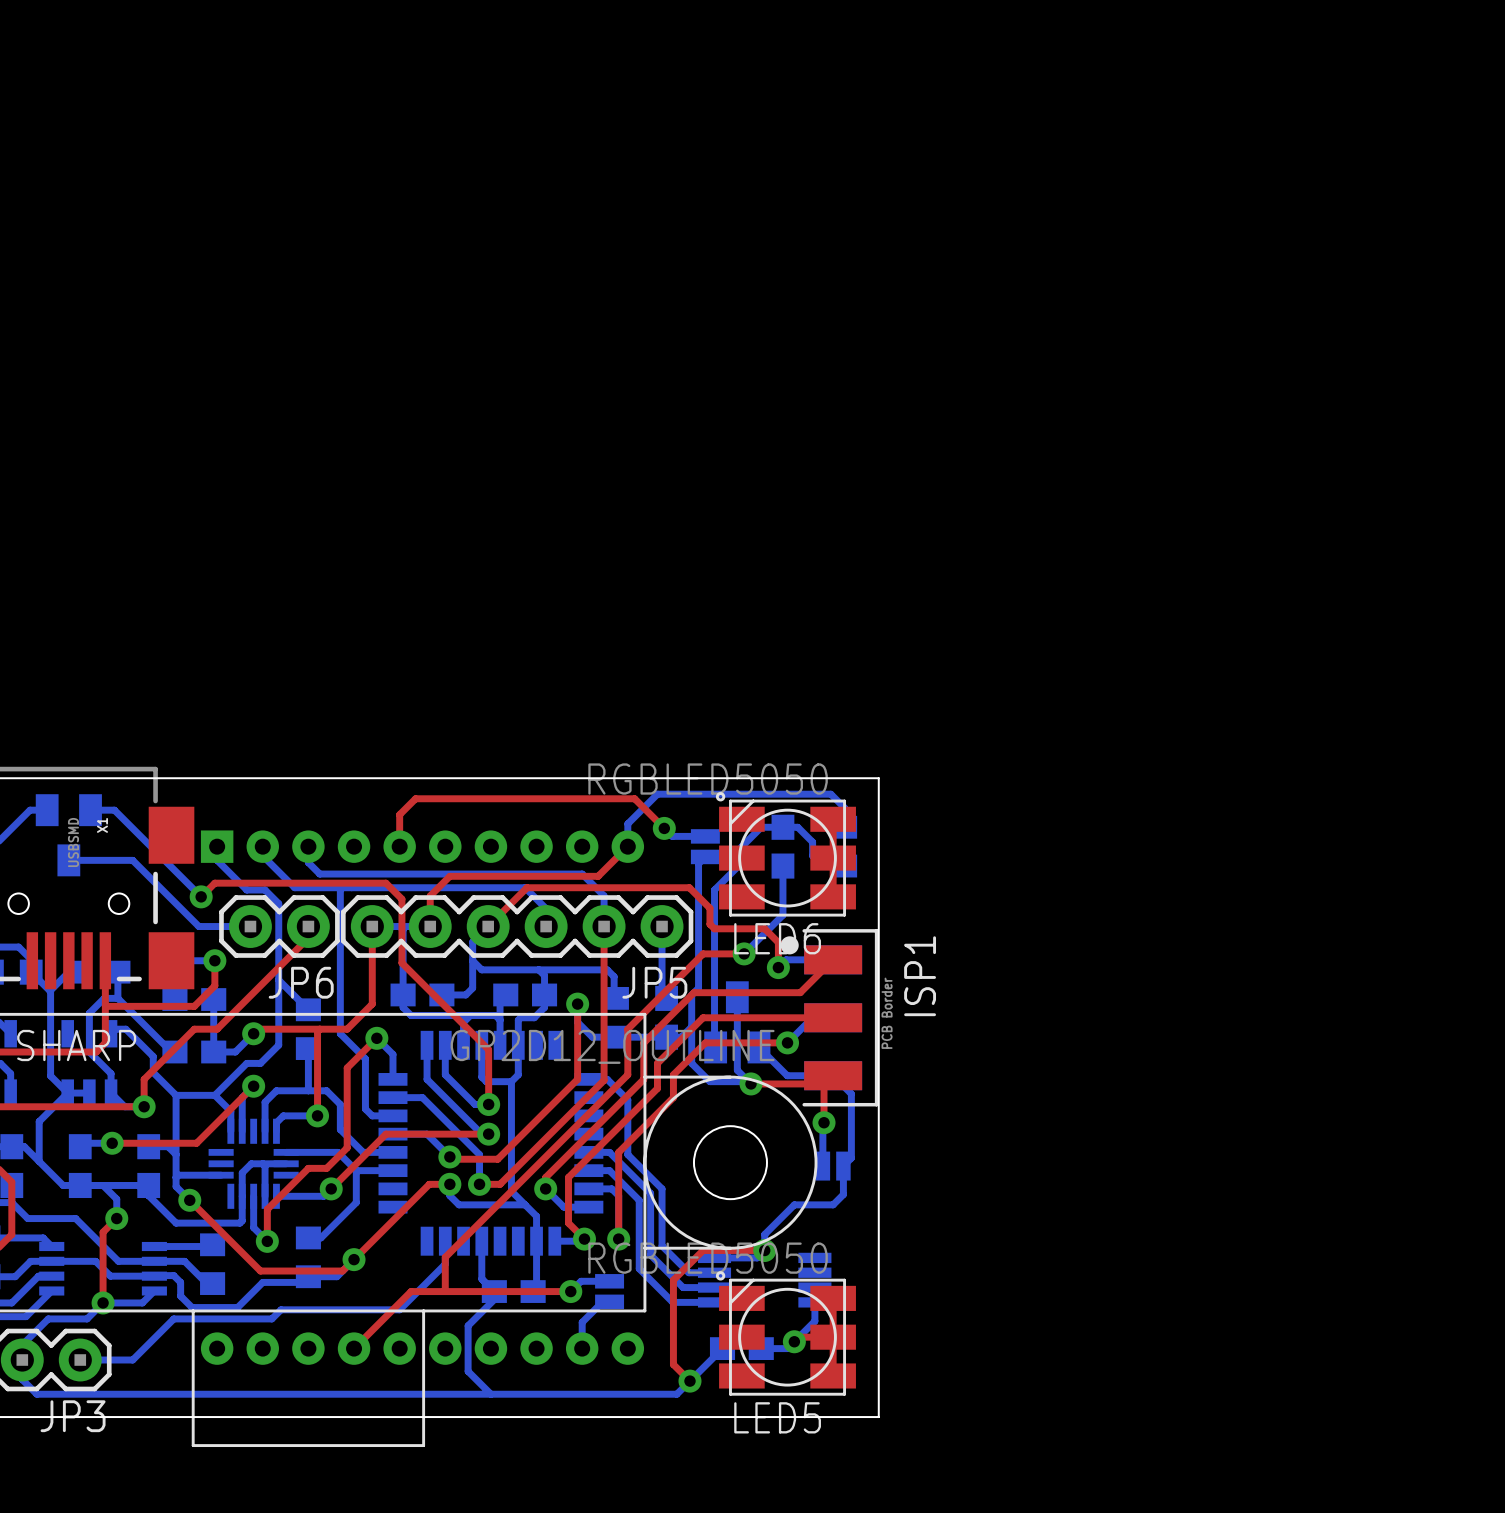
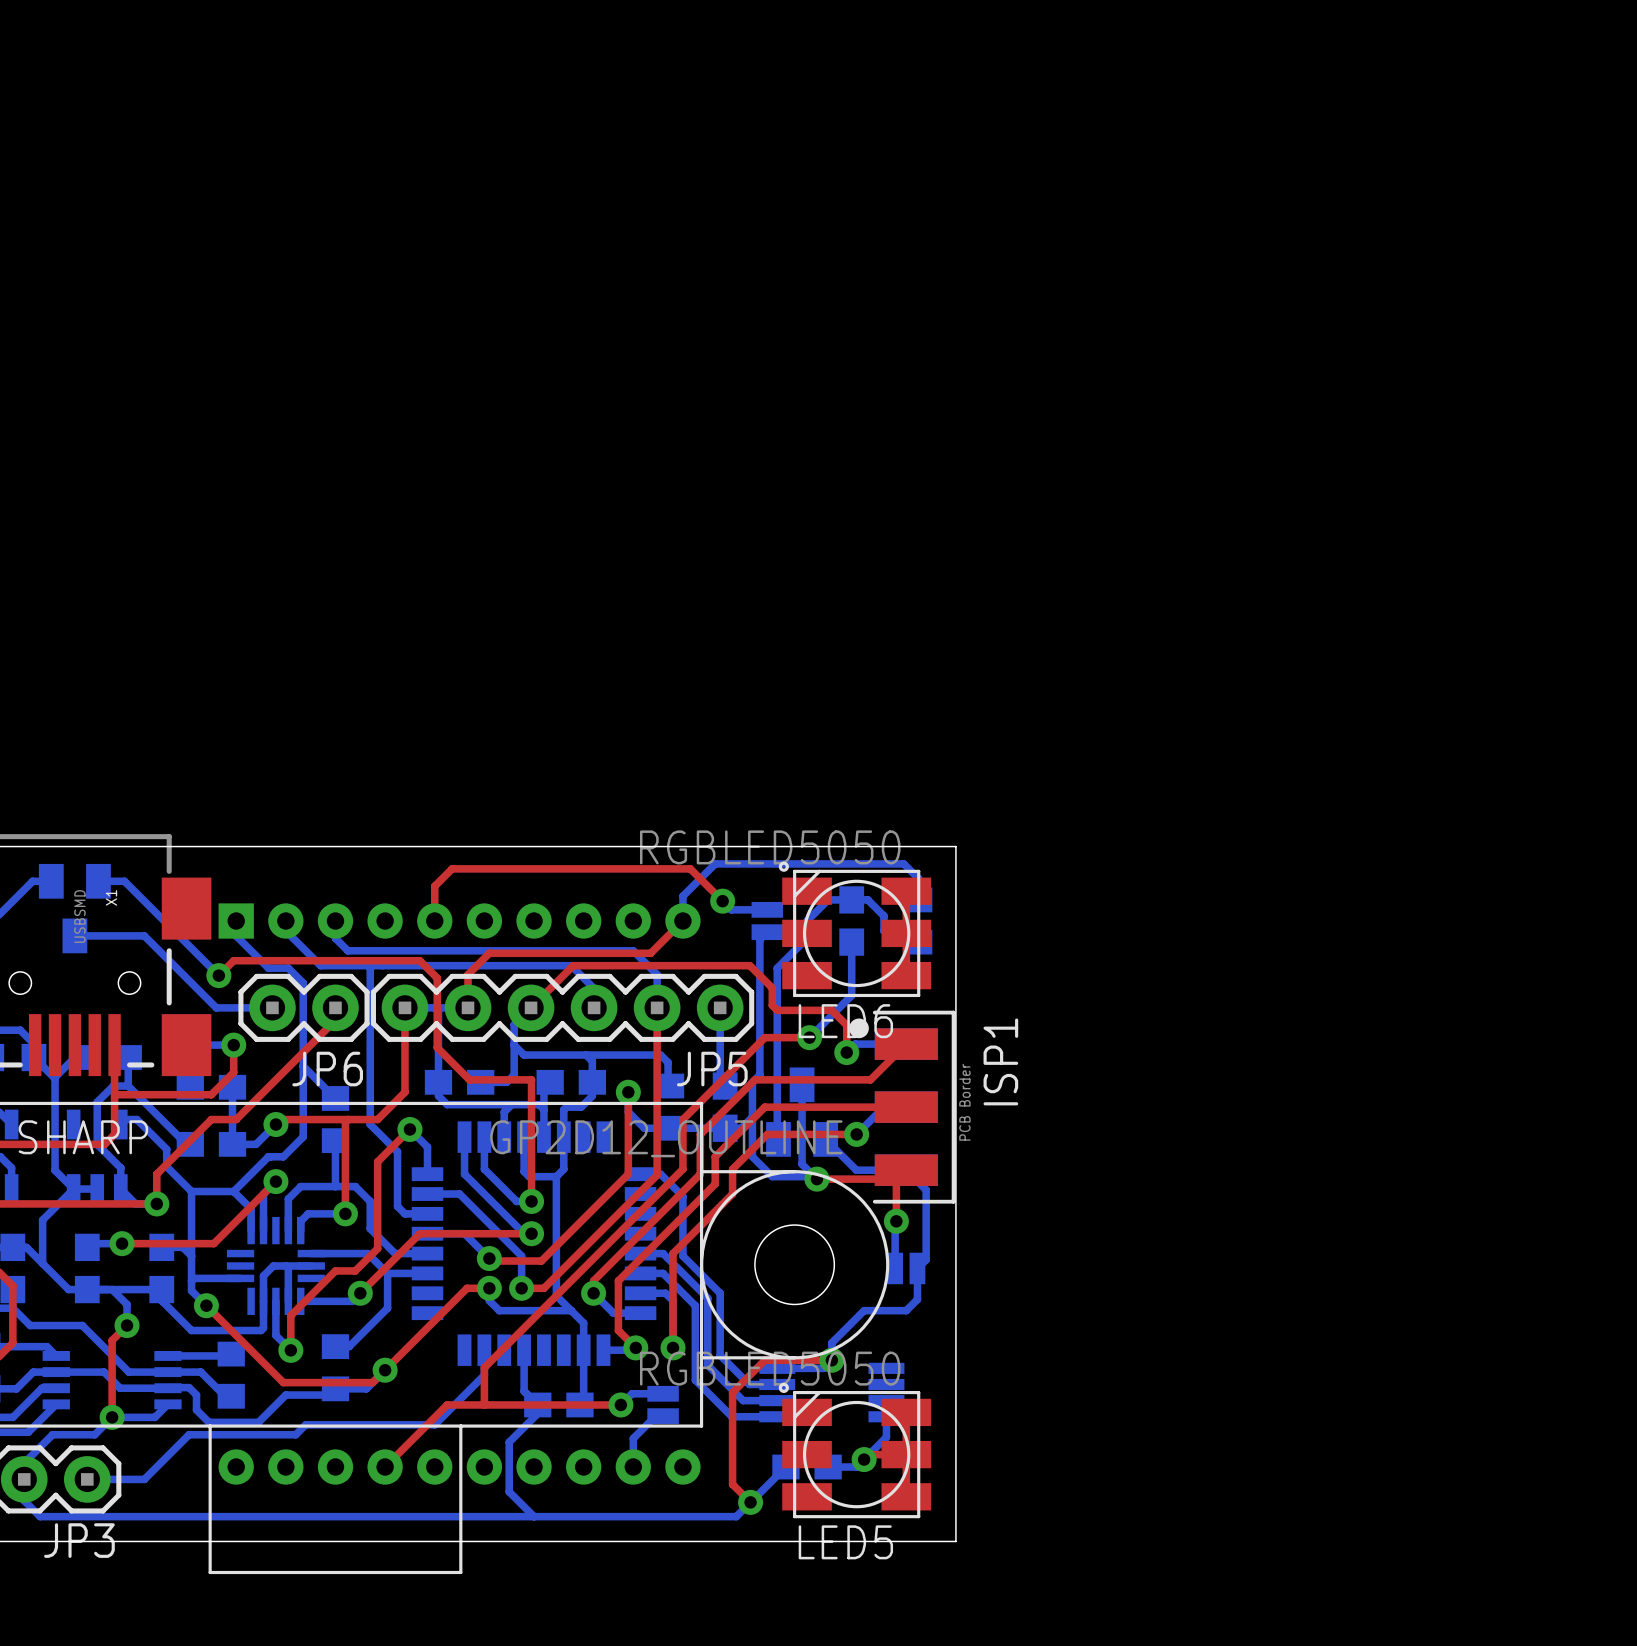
top track: (431, 992) (488, 1049) -> (469, 1079) (531, 1079) (531, 1141)

